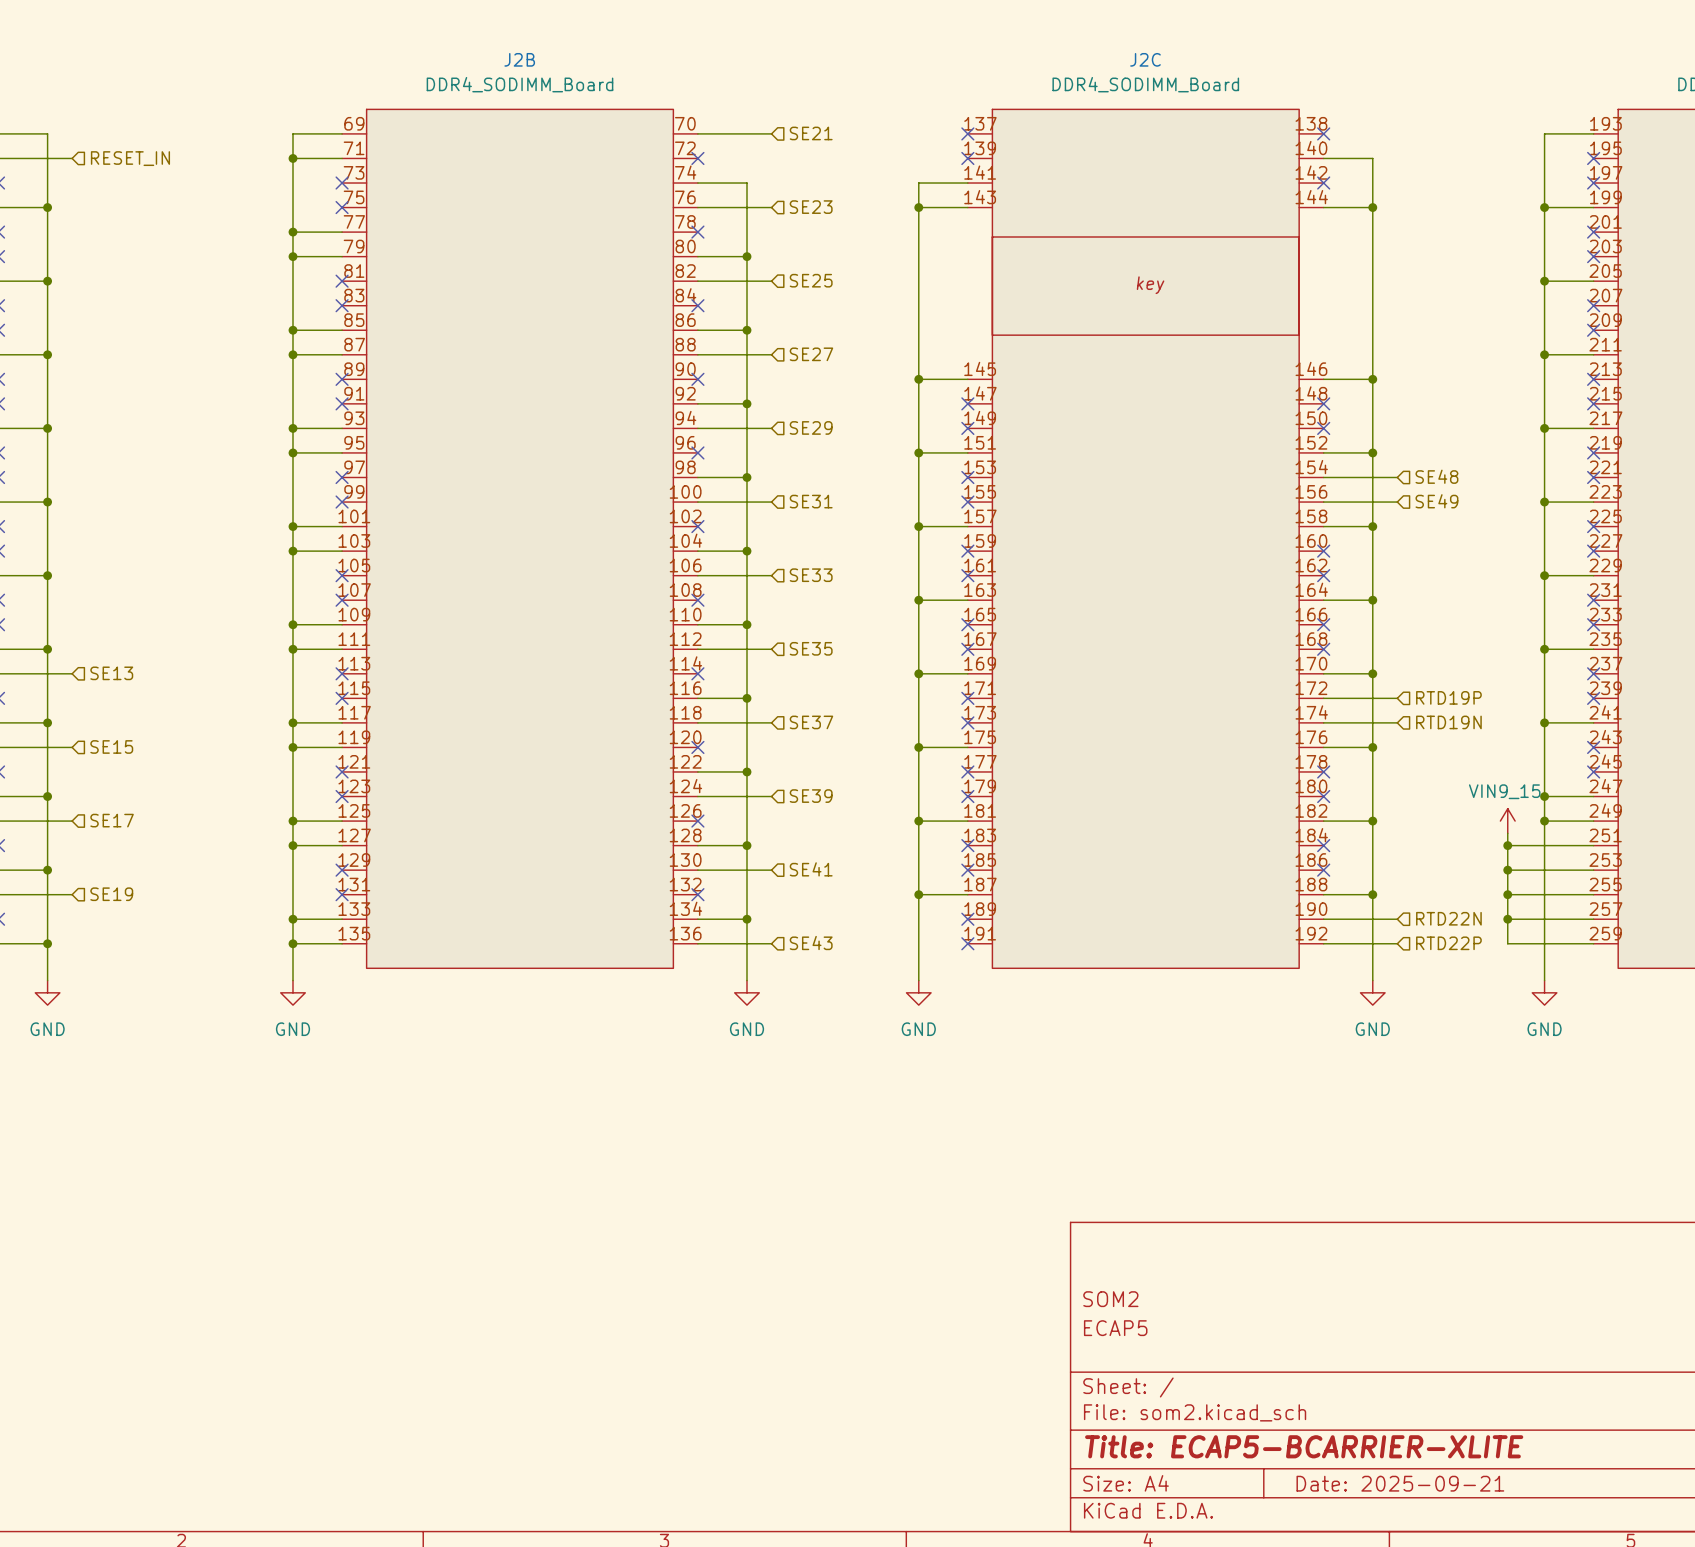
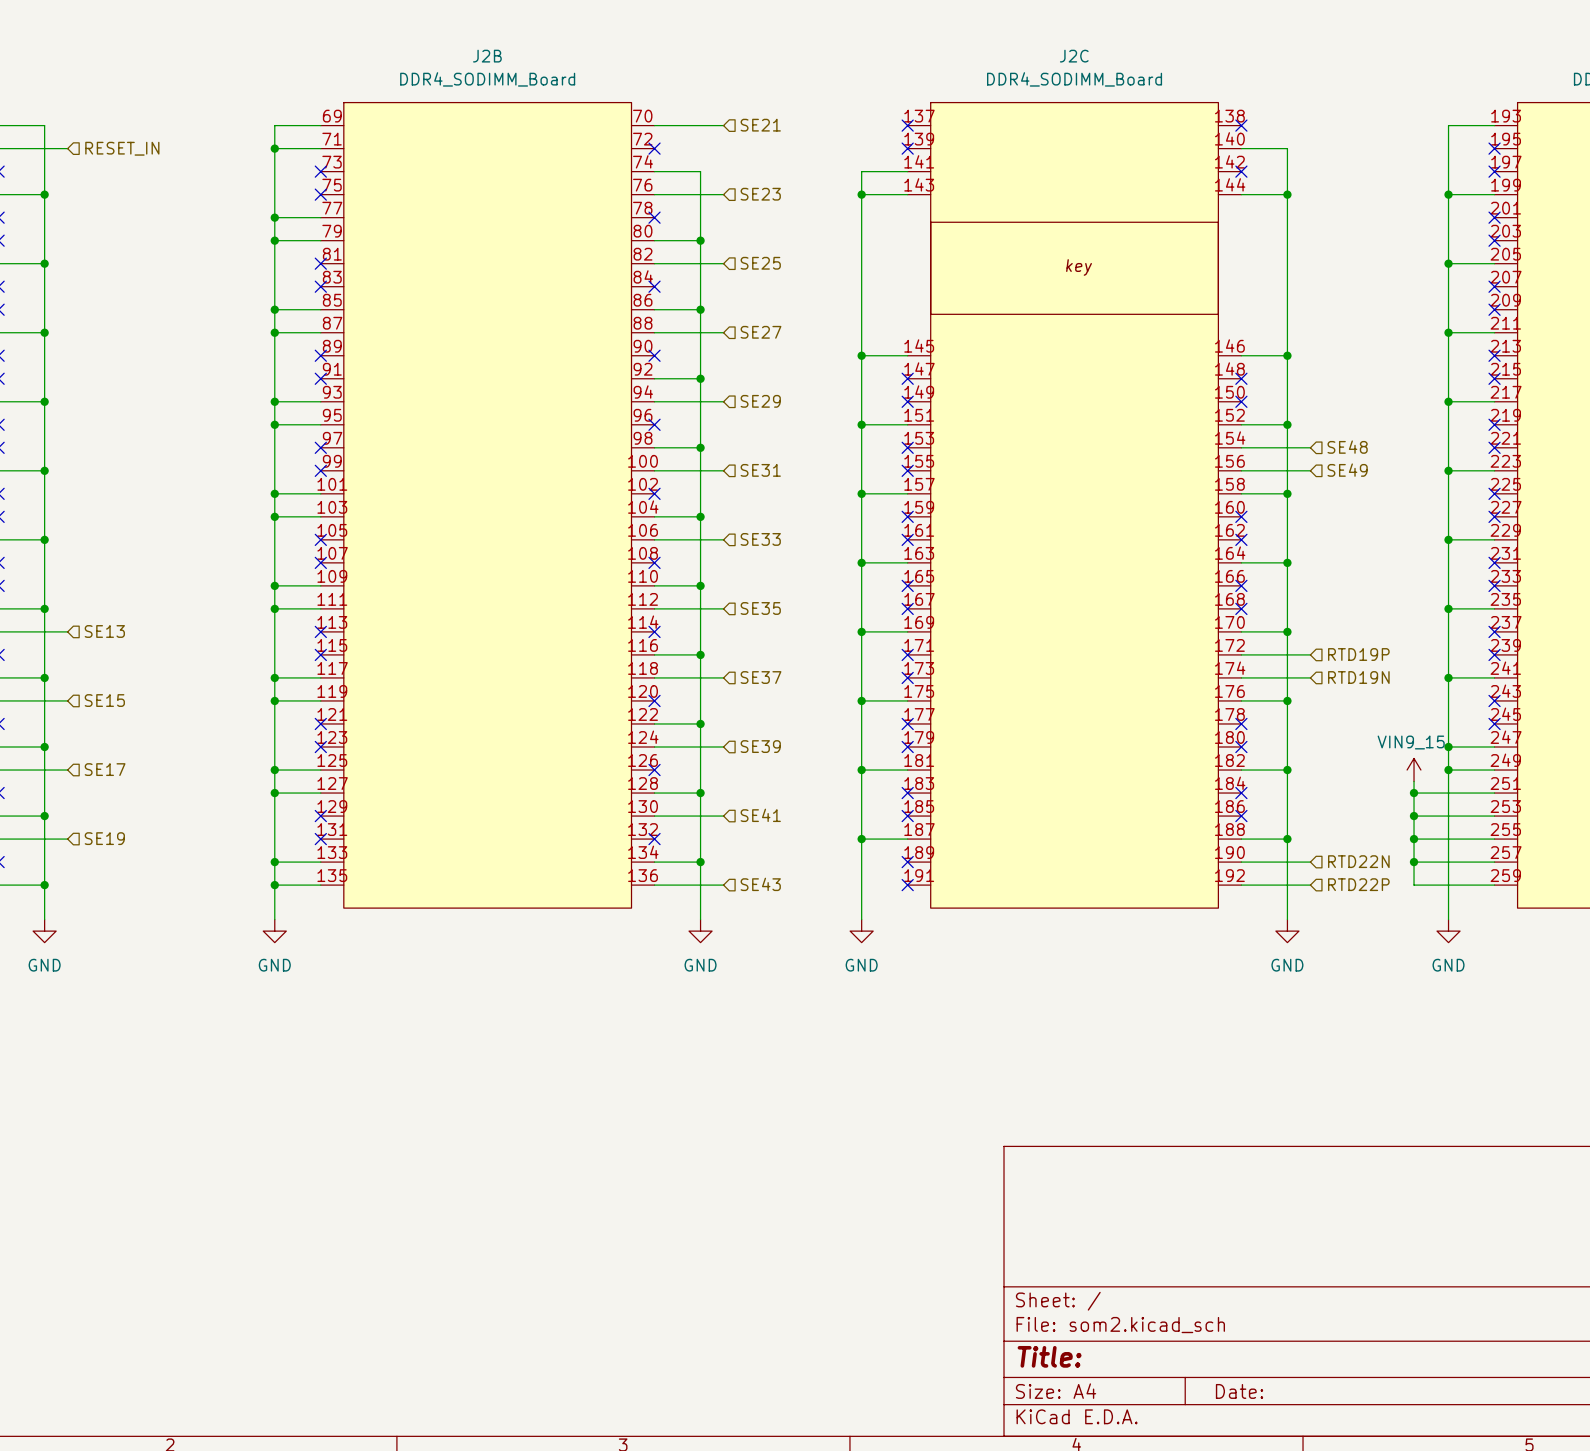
title block: SOM2 (1110, 1299) -> none
title block: ECAP5 (1115, 1328) -> none
title block: Title: ECAP5-BCARRIER-XLITE (1304, 1446) -> Title: (1049, 1356)
title block: Date: 2025-09-21 (1400, 1483) -> Date: (1239, 1391)

